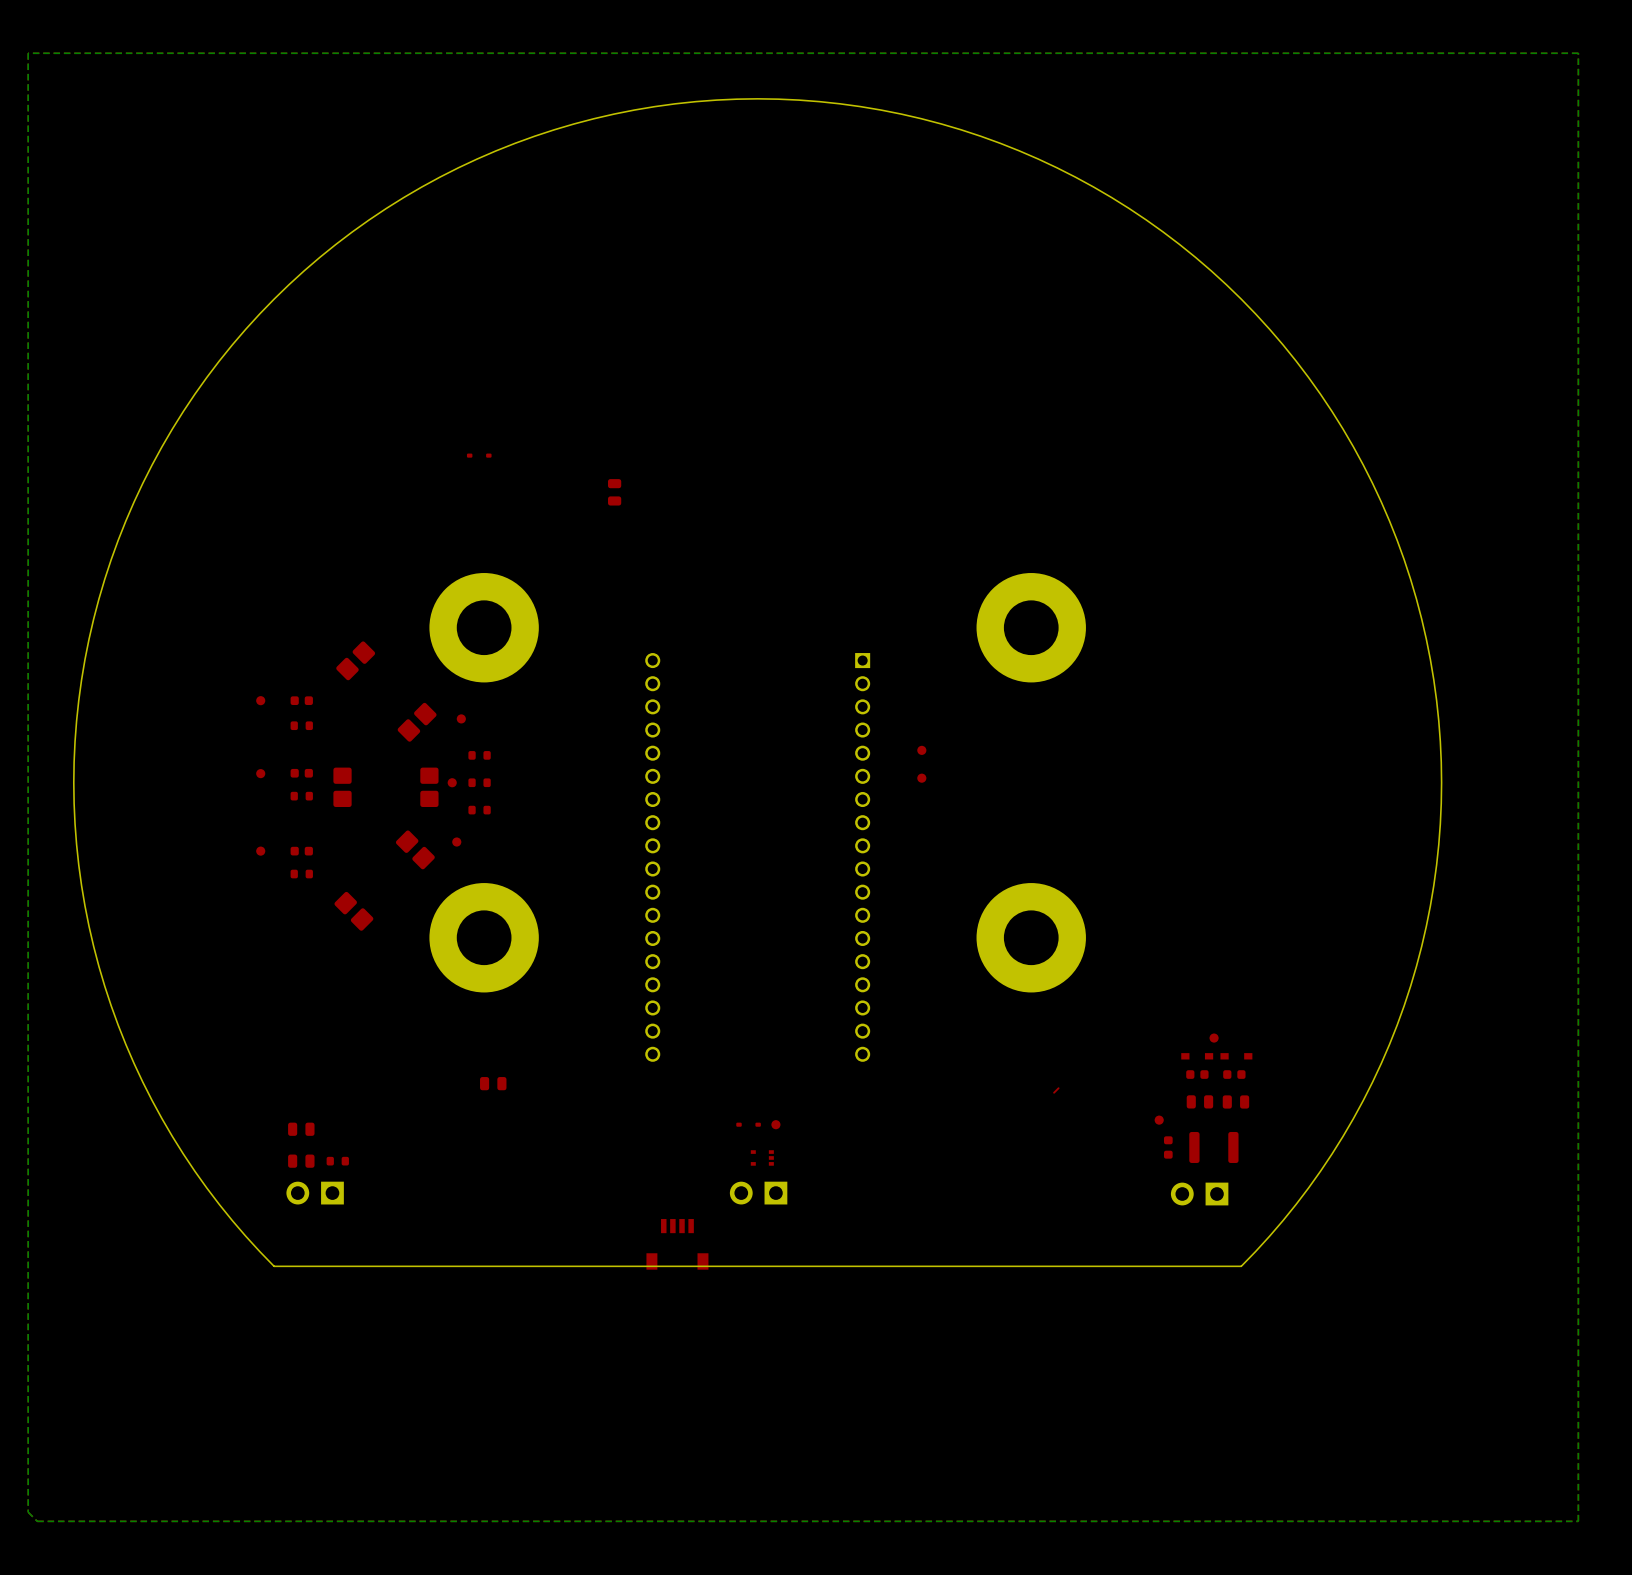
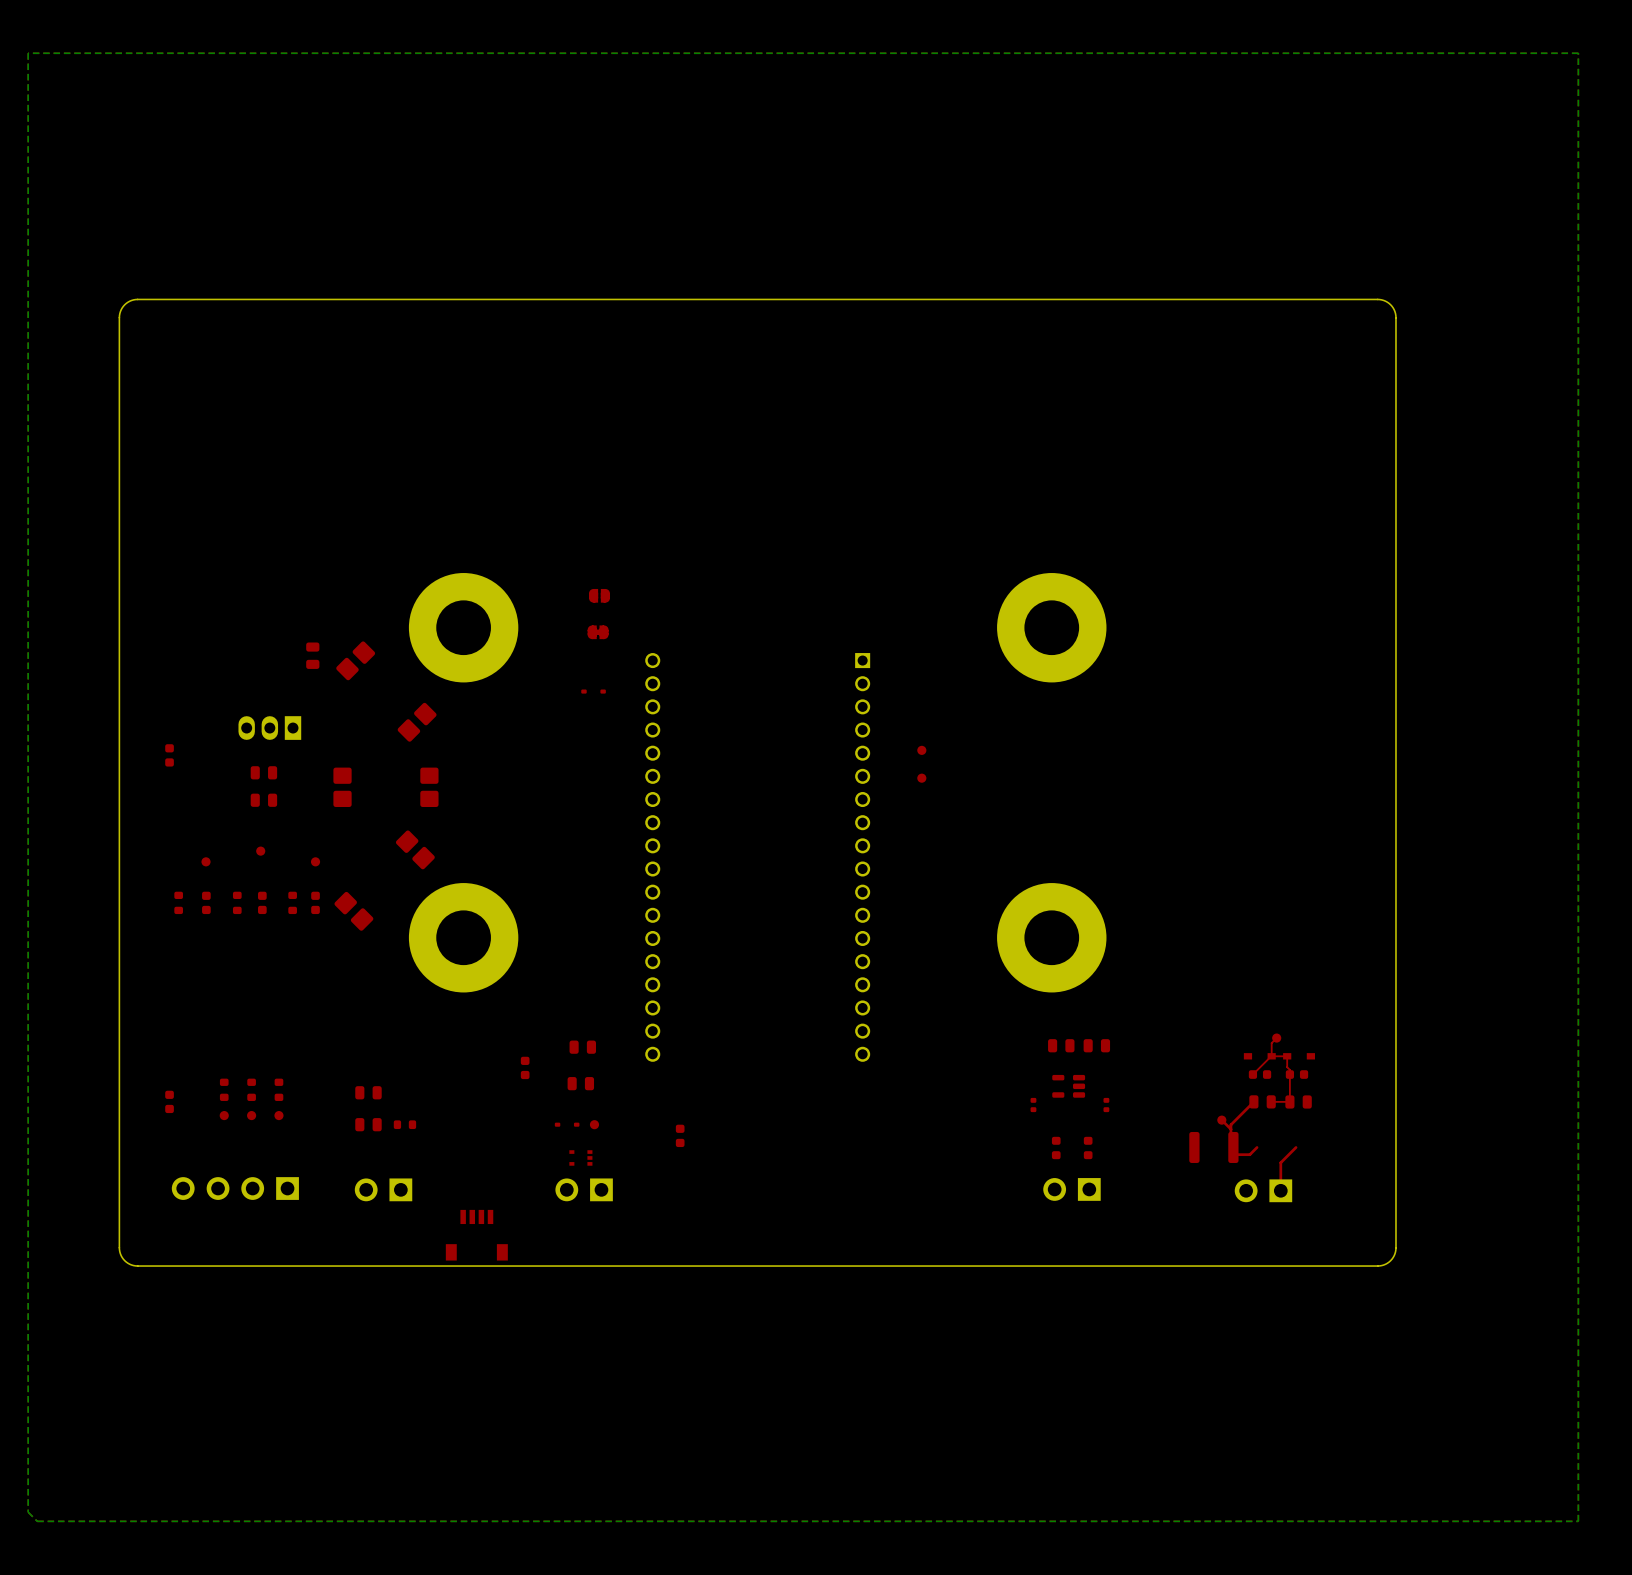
part: (479, 455) -> none
part: (614, 492) -> none
part: none -> (599, 595)
part position: (484, 627) -> (463, 627)
part position: (1031, 627) -> (1051, 627)
part: none -> (598, 632)
part: none -> (312, 655)
part: none -> (593, 691)
part: (260, 700) -> none
part: (301, 700) -> none
part: (461, 718) -> none
part: (301, 725) -> none
part: none -> (269, 728)
part: none -> (169, 755)
part: (479, 755) -> none
part footprint: [256, 769, 266, 779] -> [250, 766, 278, 780]
part: (301, 773) -> none
part: (452, 782) -> none
part: (479, 782) -> none
part: (301, 796) -> none
part: none -> (263, 800)
part: (479, 810) -> none
part: (456, 842) -> none
part: (301, 851) -> none
part: none -> (206, 861)
part: none -> (315, 861)
part rotation: 0° (301, 874) -> 90° clockwise (292, 902)
part position: (301, 874) -> (292, 902)
part: none -> (178, 902)
part: none -> (206, 902)
part: none -> (237, 902)
part: none -> (262, 902)
part: none -> (315, 902)
part position: (484, 937) -> (463, 937)
part position: (1031, 937) -> (1051, 937)
part: (1214, 1038) -> none
top track: none -> (1276, 1038) (1271, 1043) (1271, 1056)
part: none -> (1276, 1038)
part: none -> (1061, 1045)
part: none -> (1096, 1045)
part: none -> (582, 1047)
part: (1197, 1056) -> none
part position: (1236, 1056) -> (1259, 1056)
part: none -> (1299, 1056)
part: none -> (525, 1067)
part: (1197, 1074) -> none
part position: (1234, 1074) -> (1260, 1074)
top track: none -> (1252, 1074) (1271, 1056) (1287, 1056) (1287, 1067) (1289, 1069) (1289, 1101)
part: none -> (1296, 1074)
part: (493, 1083) -> none
part: none -> (580, 1083)
part: none -> (1068, 1086)
top track: (1058, 1088) (1054, 1092) -> none
part: none -> (224, 1089)
part: none -> (251, 1089)
part: none -> (278, 1089)
part: none -> (368, 1092)
part: none -> (169, 1101)
part: (1199, 1101) -> none
part position: (1235, 1101) -> (1262, 1101)
top track: none -> (1253, 1101) (1230, 1124) (1230, 1140)
top track: none -> (1289, 1101) (1271, 1101)
part: none -> (1298, 1101)
part: none -> (1033, 1105)
part: none -> (1106, 1105)
part: none -> (224, 1115)
part: none -> (251, 1115)
part: none -> (278, 1115)
part: (1159, 1120) -> none
top track: none -> (1221, 1120) (1230, 1129)
part: none -> (1221, 1120)
part: none -> (368, 1124)
part: none -> (404, 1124)
part: none -> (594, 1124)
part position: (748, 1124) -> (567, 1124)
part: (775, 1124) -> none
part: (301, 1129) -> none
part: none -> (680, 1135)
part: none -> (1056, 1147)
part: none -> (1088, 1147)
part: (1168, 1147) -> none
top track: none -> (1257, 1147) (1249, 1154) (1230, 1154)
top track: none -> (1296, 1147) (1280, 1162) (1280, 1190)
part position: (762, 1157) -> (580, 1157)
part: (301, 1161) -> none
part: (337, 1161) -> none
part: none -> (235, 1188)
part: none -> (584, 1189)
part: none -> (1071, 1189)
part: none -> (1263, 1190)
part position: (315, 1193) -> (383, 1189)
part: (758, 1193) -> none
part: (1199, 1194) -> none
part position: (677, 1244) -> (476, 1235)
board edge: (1241, 1266) (274, 1266) (232, 1220) (194, 1171) (162, 1118) (125, 1044) (104, 986) (89, 926) (78, 865) (73, 782) (76, 720) (89, 639) (104, 579) (125, 521) (152, 464) (183, 411) (232, 344) (274, 299) (319, 257) (386, 208) (439, 177) (495, 150) (554, 129) (614, 114) (695, 101) (757, 98) (819, 101) (901, 114) (961, 129) (1019, 150) (1093, 187) (1146, 219) (1195, 257) (1241, 299) (1283, 344) (1320, 394) (1353, 446) (1389, 521) (1410, 579) (1426, 639) (1436, 700) (1441, 782) (1436, 865) (1426, 926) (1410, 986) (1389, 1044) (1363, 1100) (1332, 1154) (1296, 1204) (1241, 1266) -> (1377, 299) (1390, 304) (1395, 317) (1395, 1247) (1394, 1255) (1389, 1262) (1377, 1266) (137, 1266) (129, 1264) (123, 1259) (119, 1247) (119, 317) (121, 309) (126, 303) (137, 299) (1377, 299)

